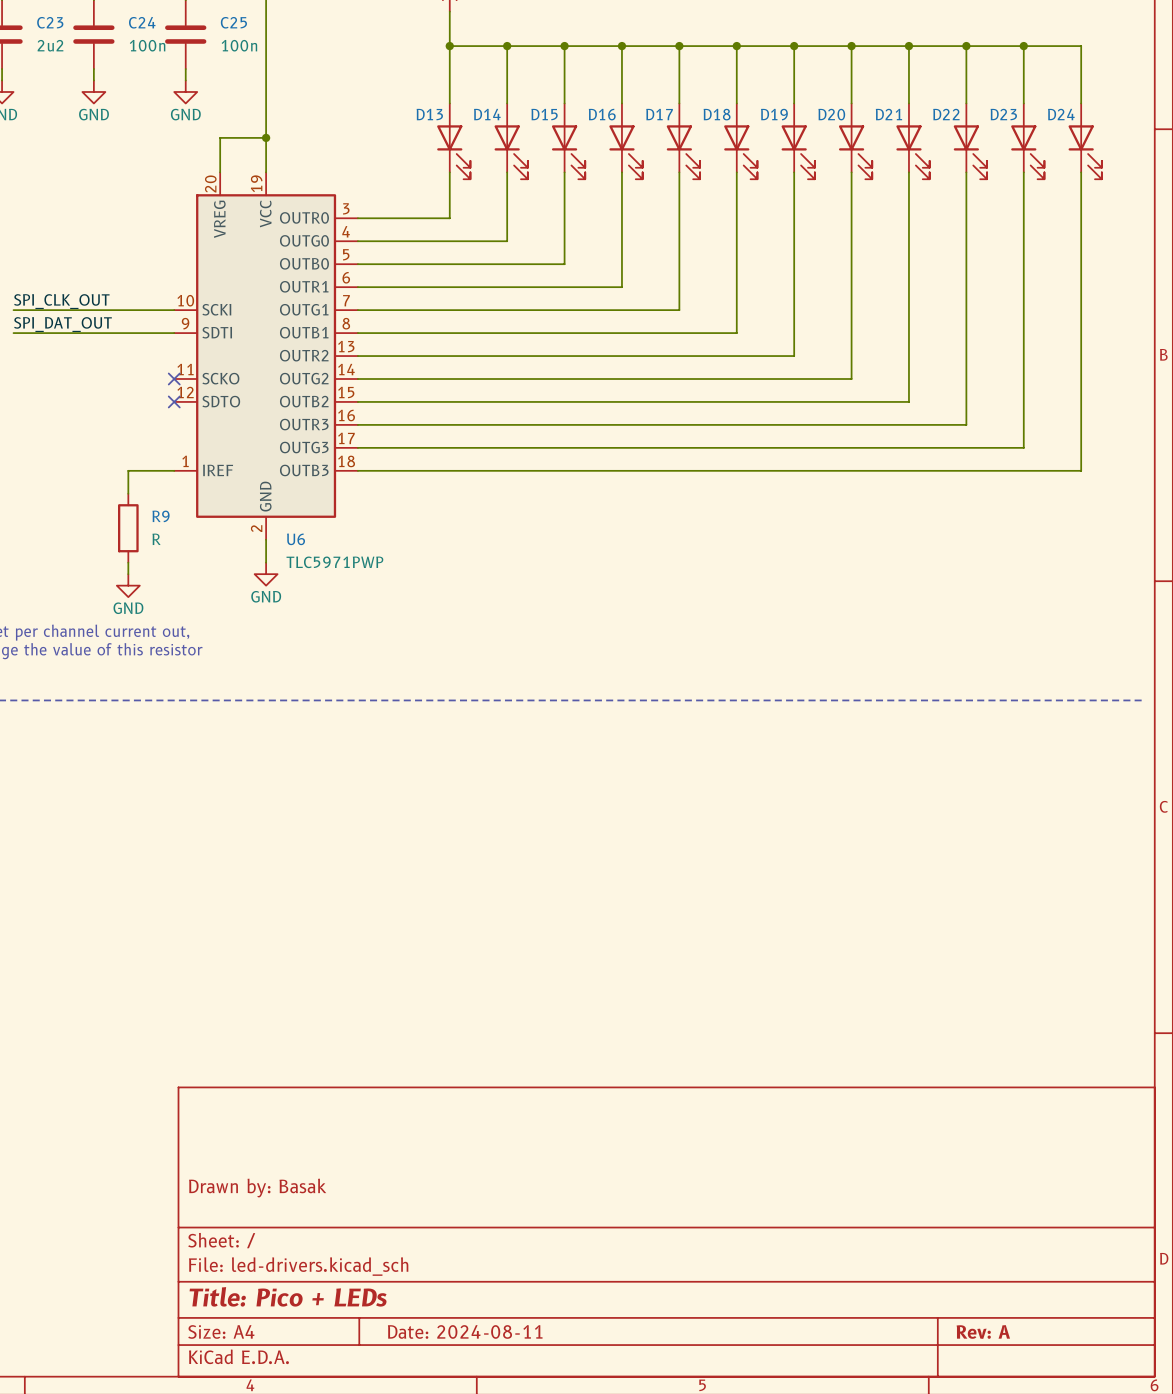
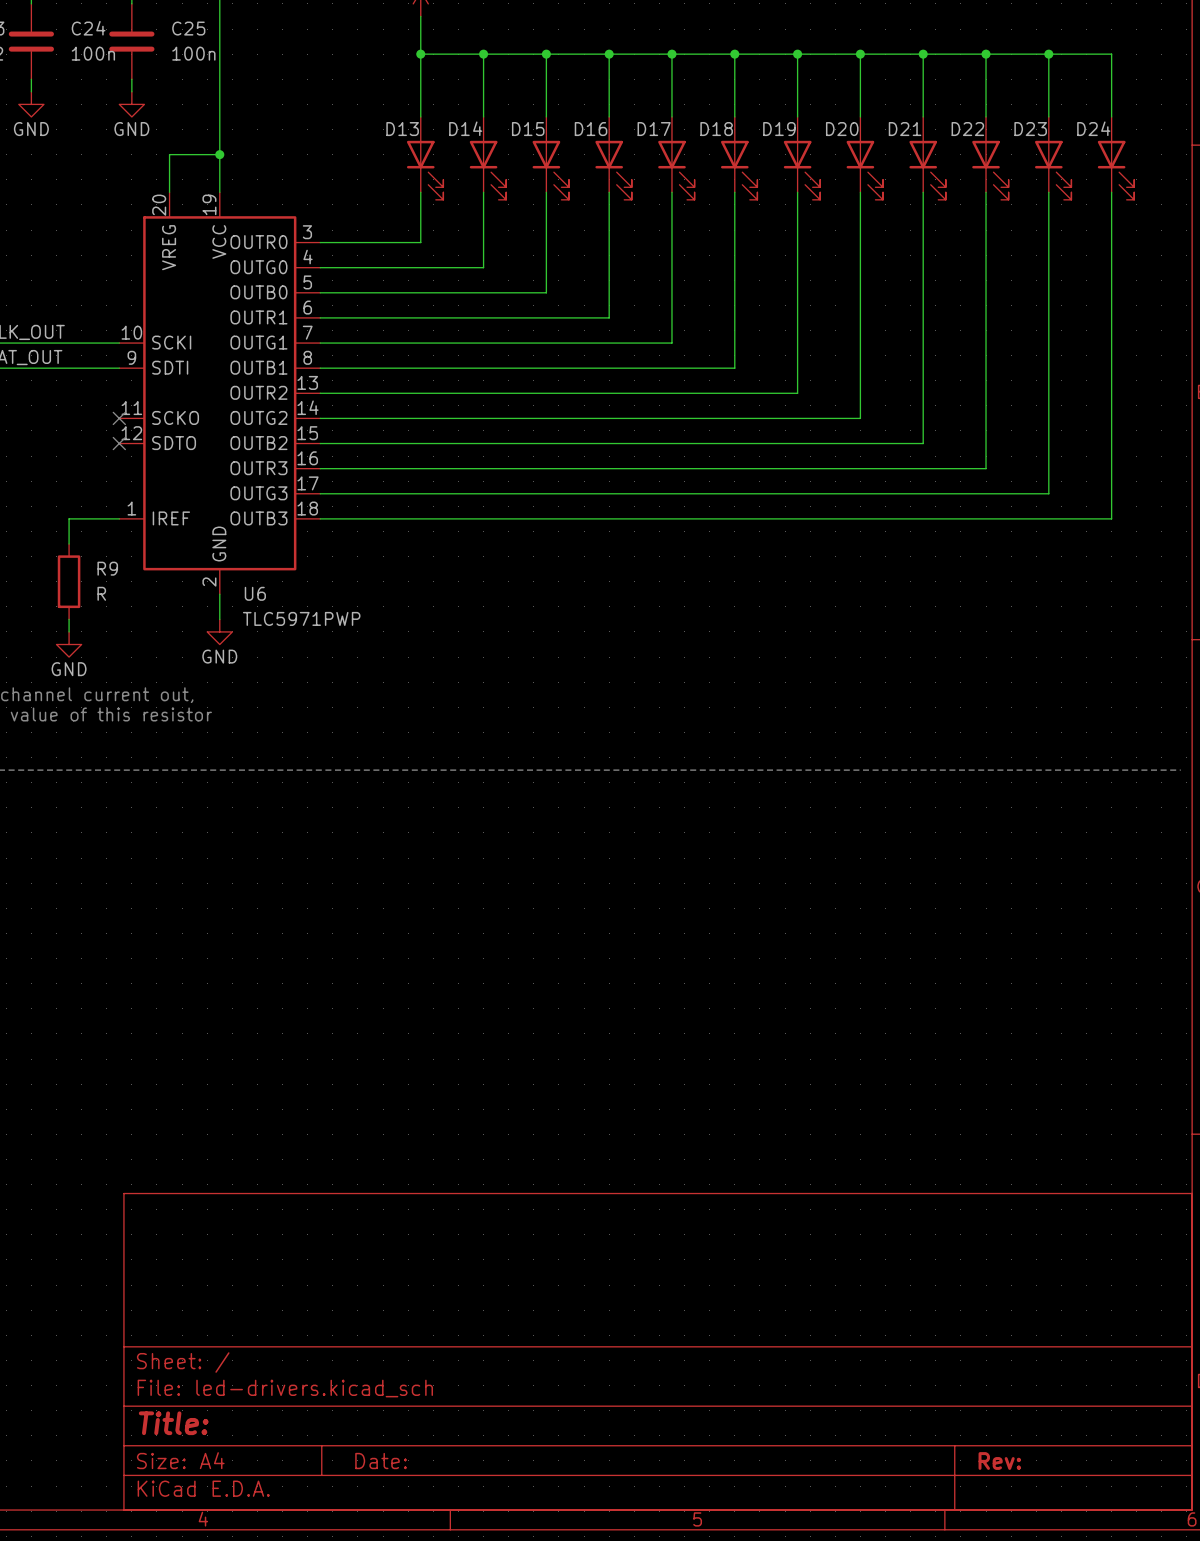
title block: Drawn by: Basak (257, 1188) -> none
title block: Title: Pico + LEDs (288, 1296) -> Title: (173, 1423)
title block: Date: 2024-08-11 (465, 1331) -> Date: (381, 1461)
title block: Rev: A (983, 1332) -> Rev: (999, 1461)

